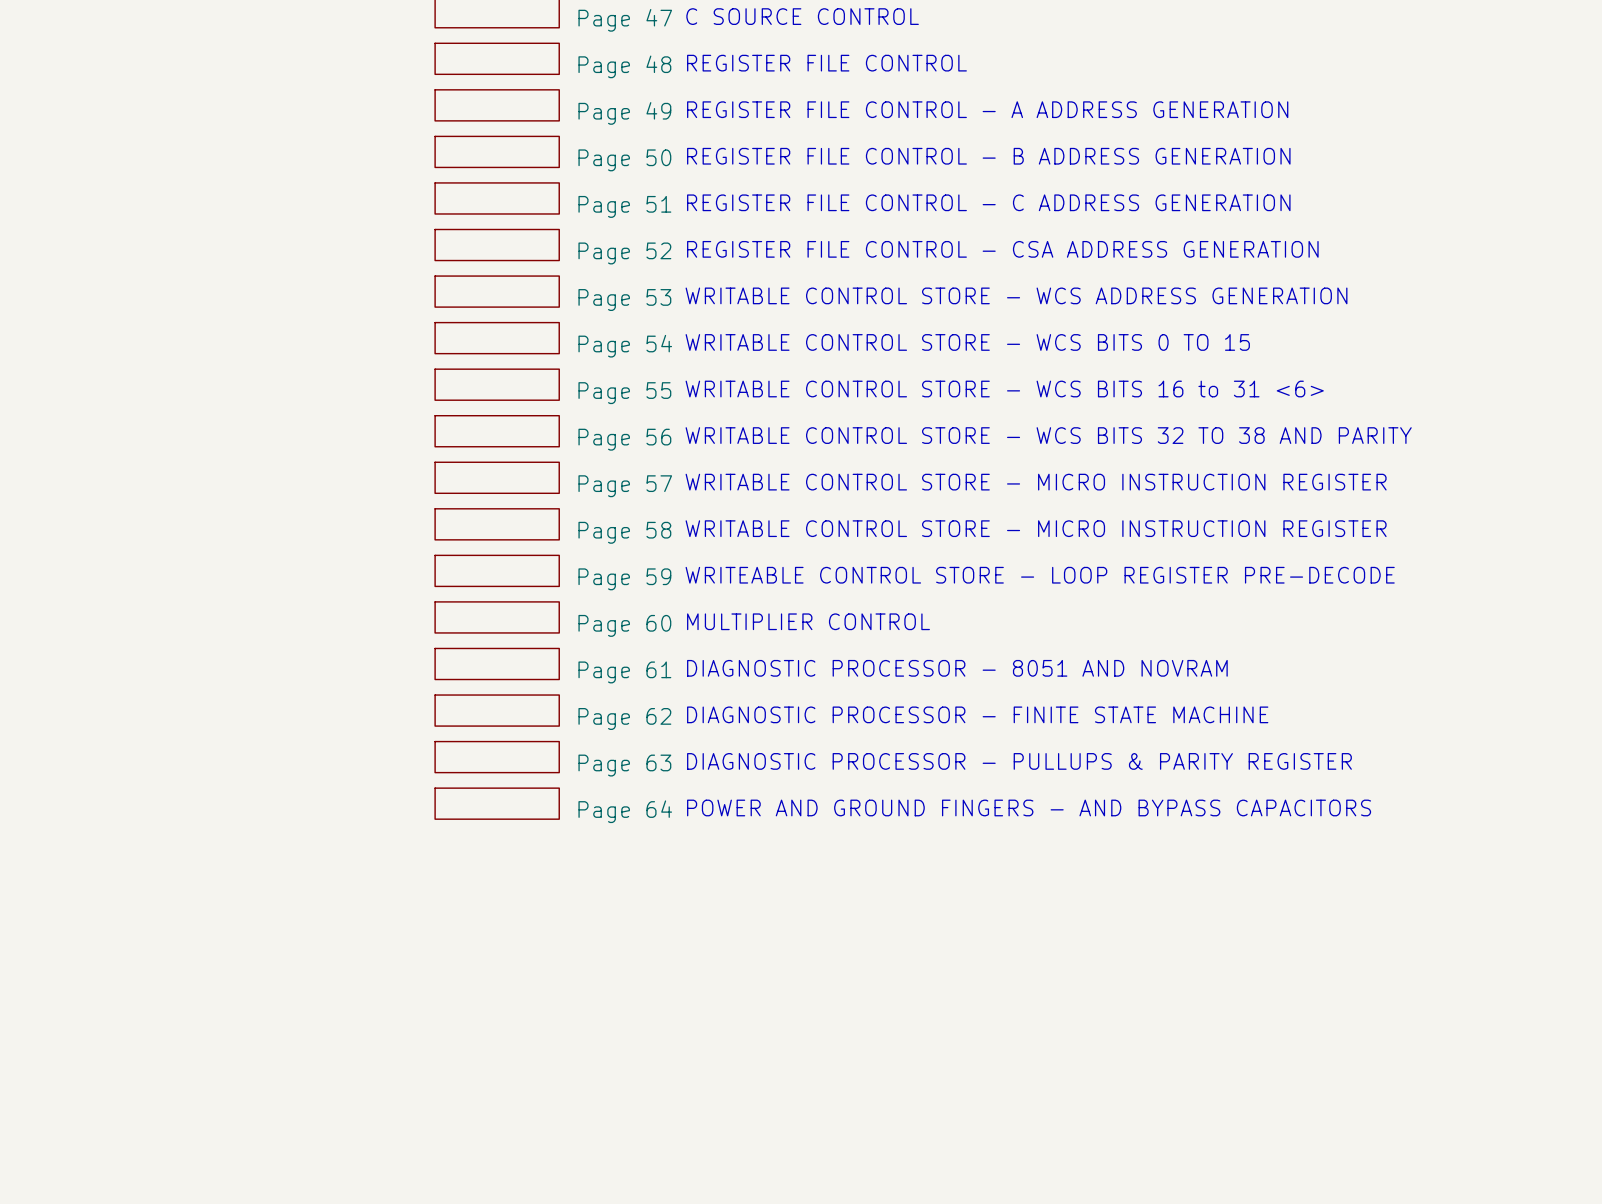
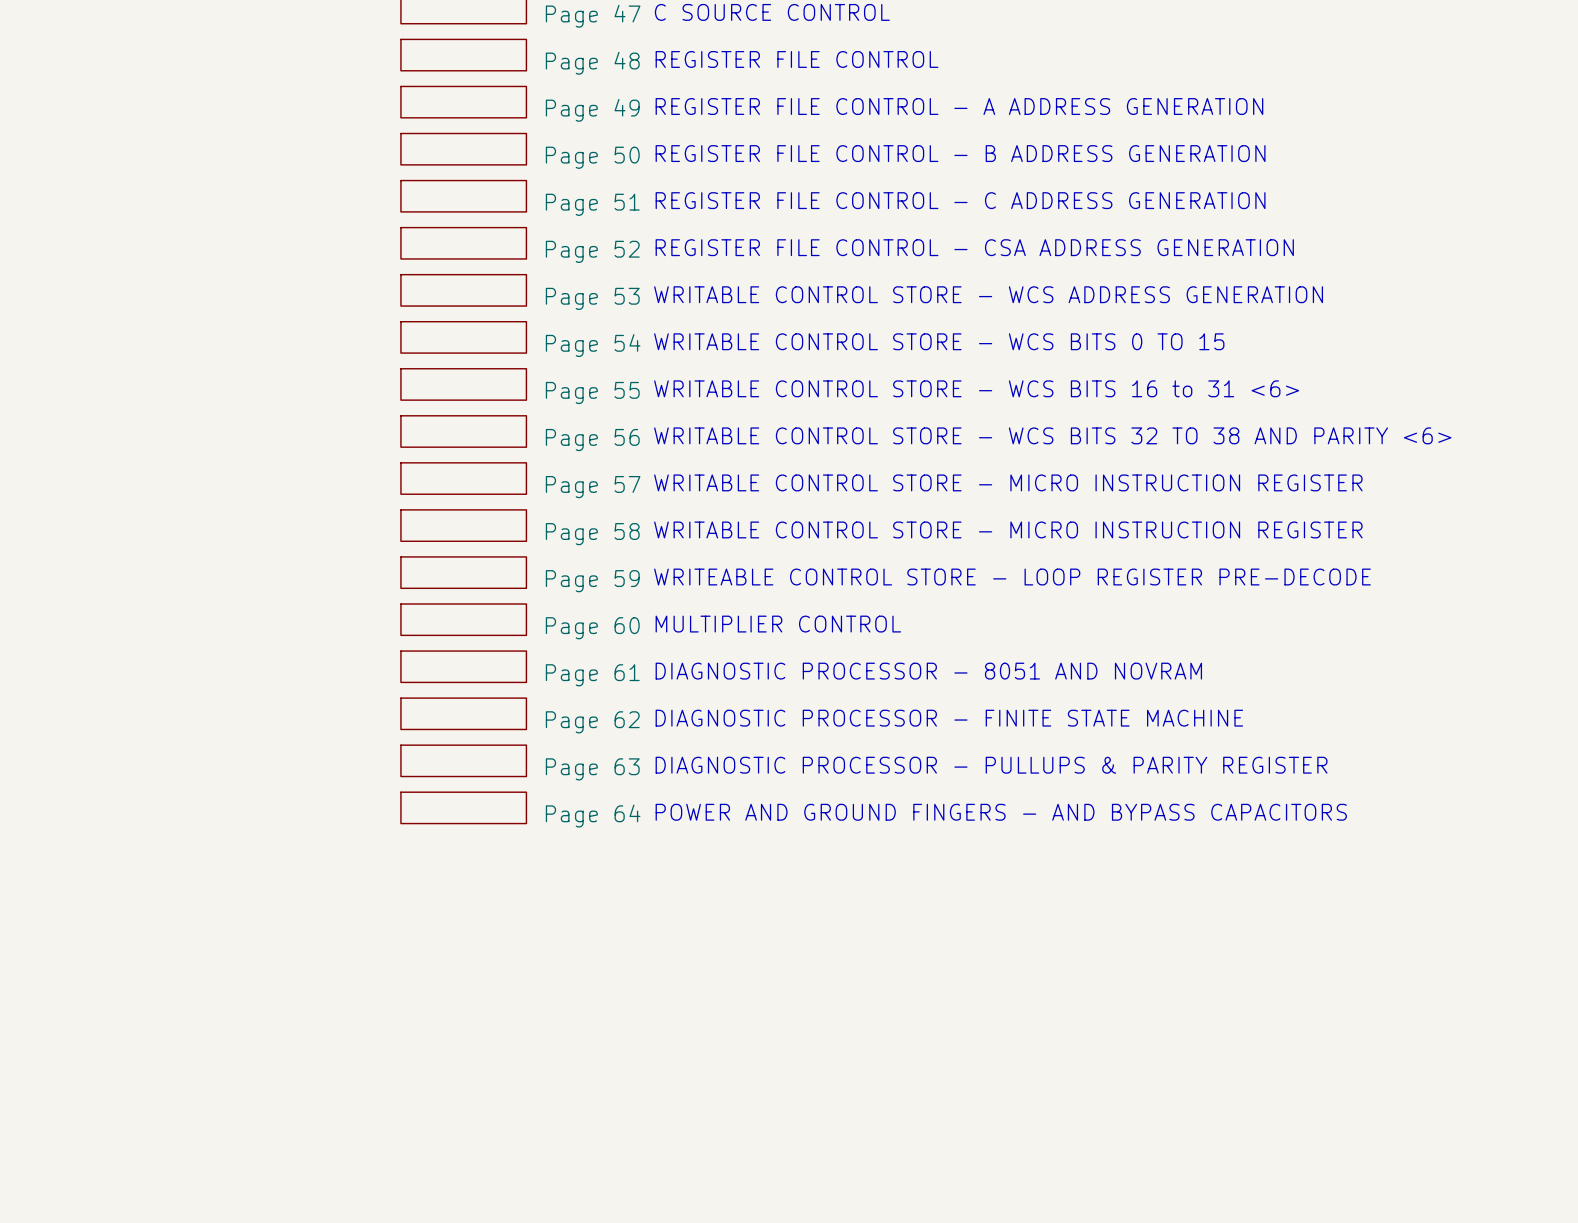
text: WRITABLE CONTROL STORE - WCS BITS 32 TO 38 AND PARITY (1048, 435) -> WRITABLE CONTROL STORE - WCS BITS 32 TO 38 AND PARITY <6> (1052, 435)

